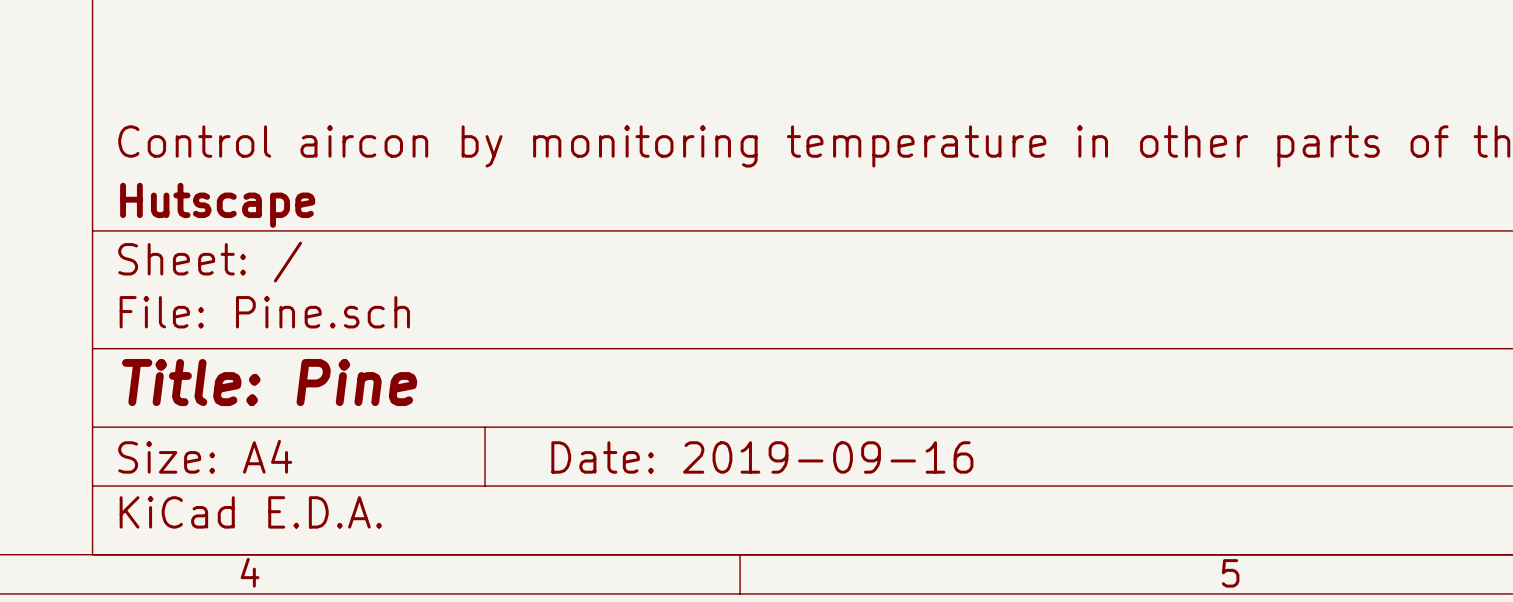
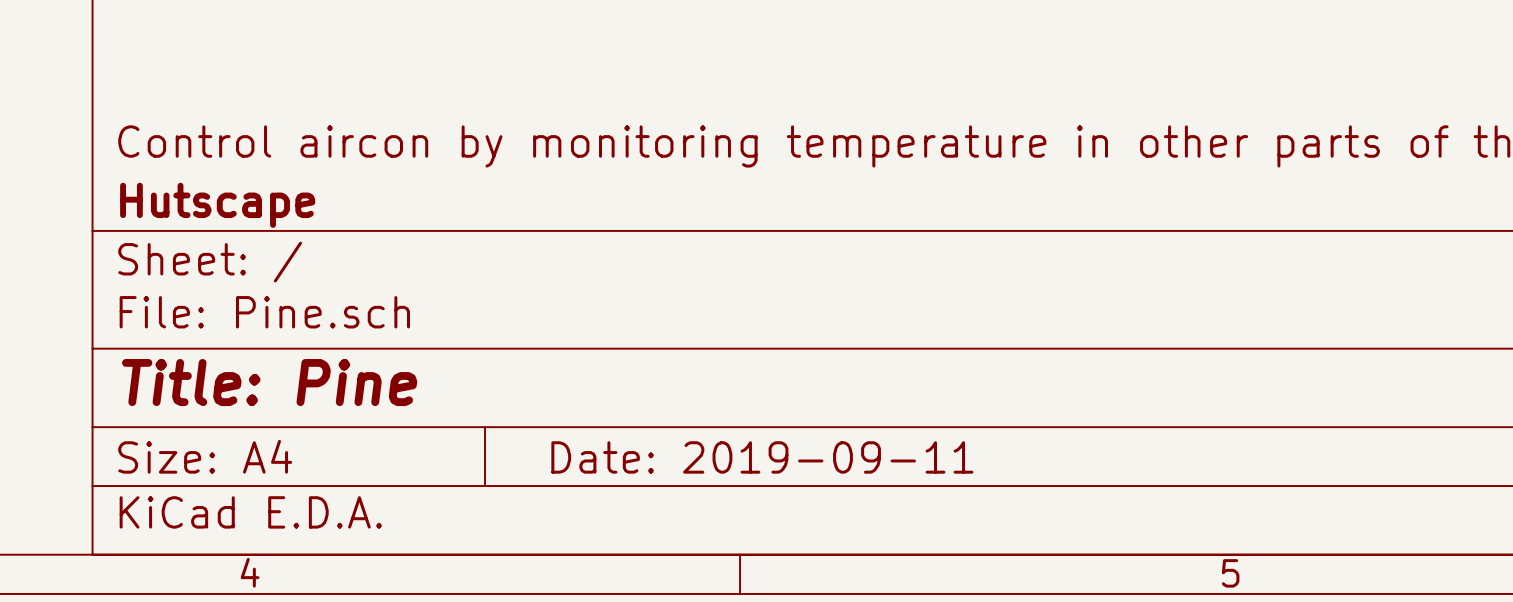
title block: Date: 2019-09-16 (762, 457) -> Date: 2019-09-11 (762, 457)

